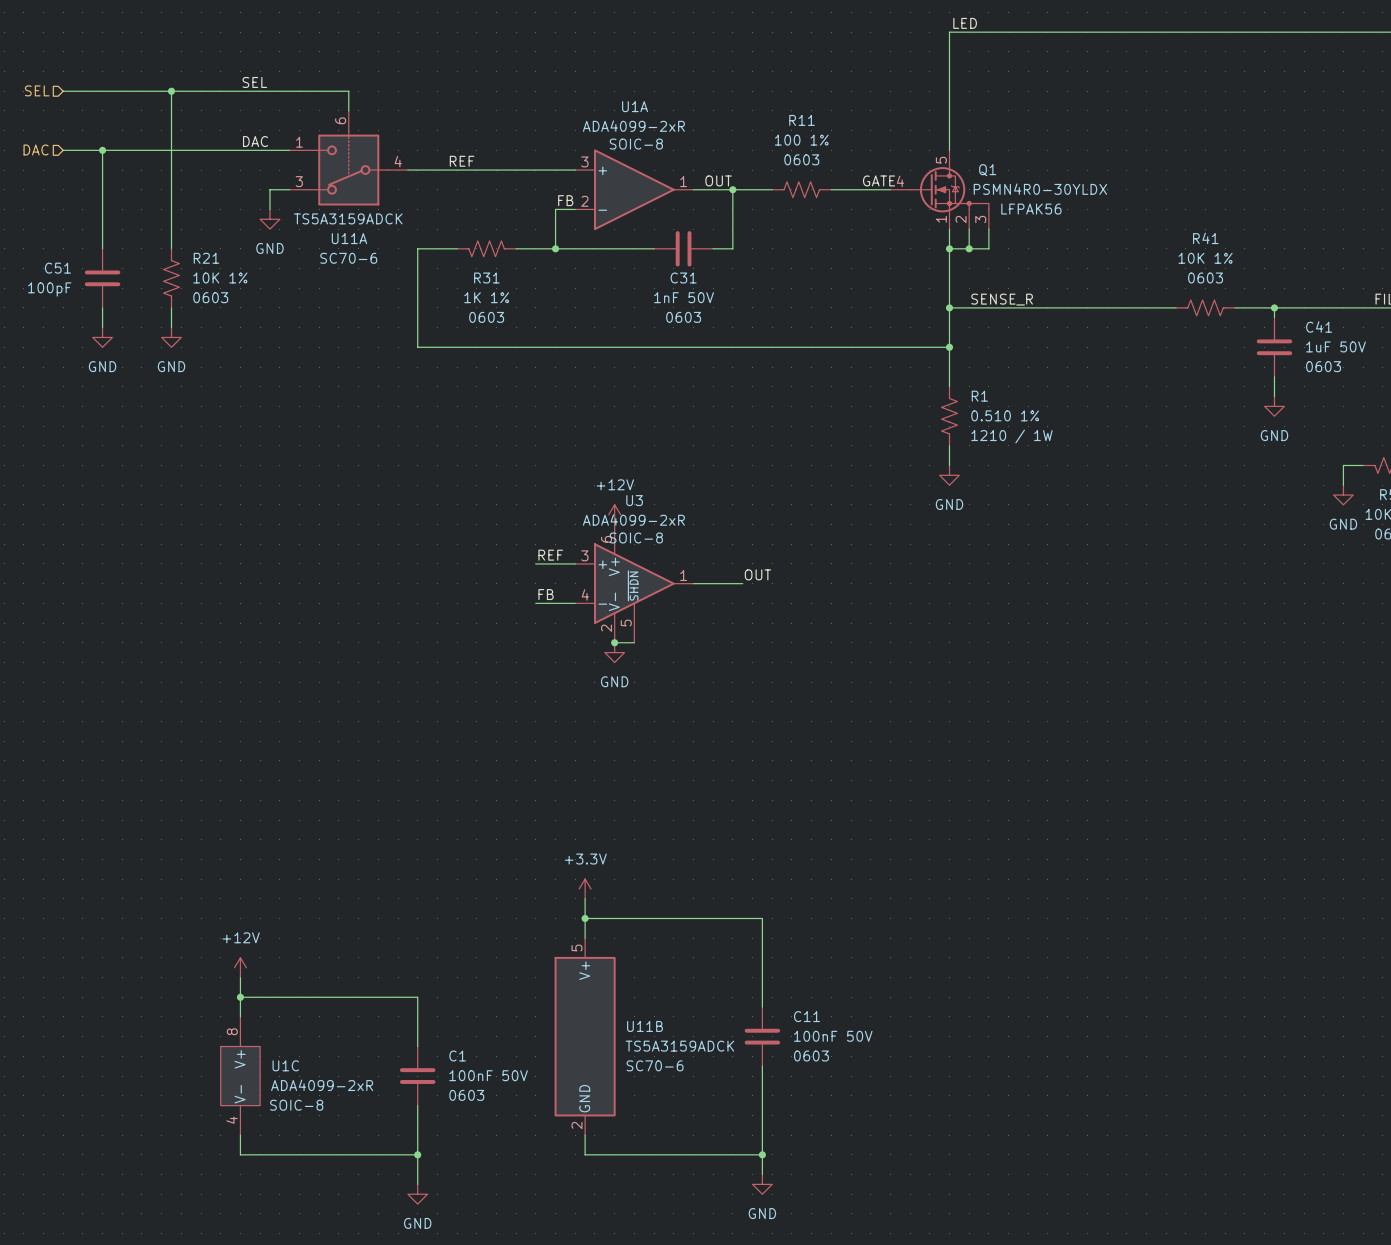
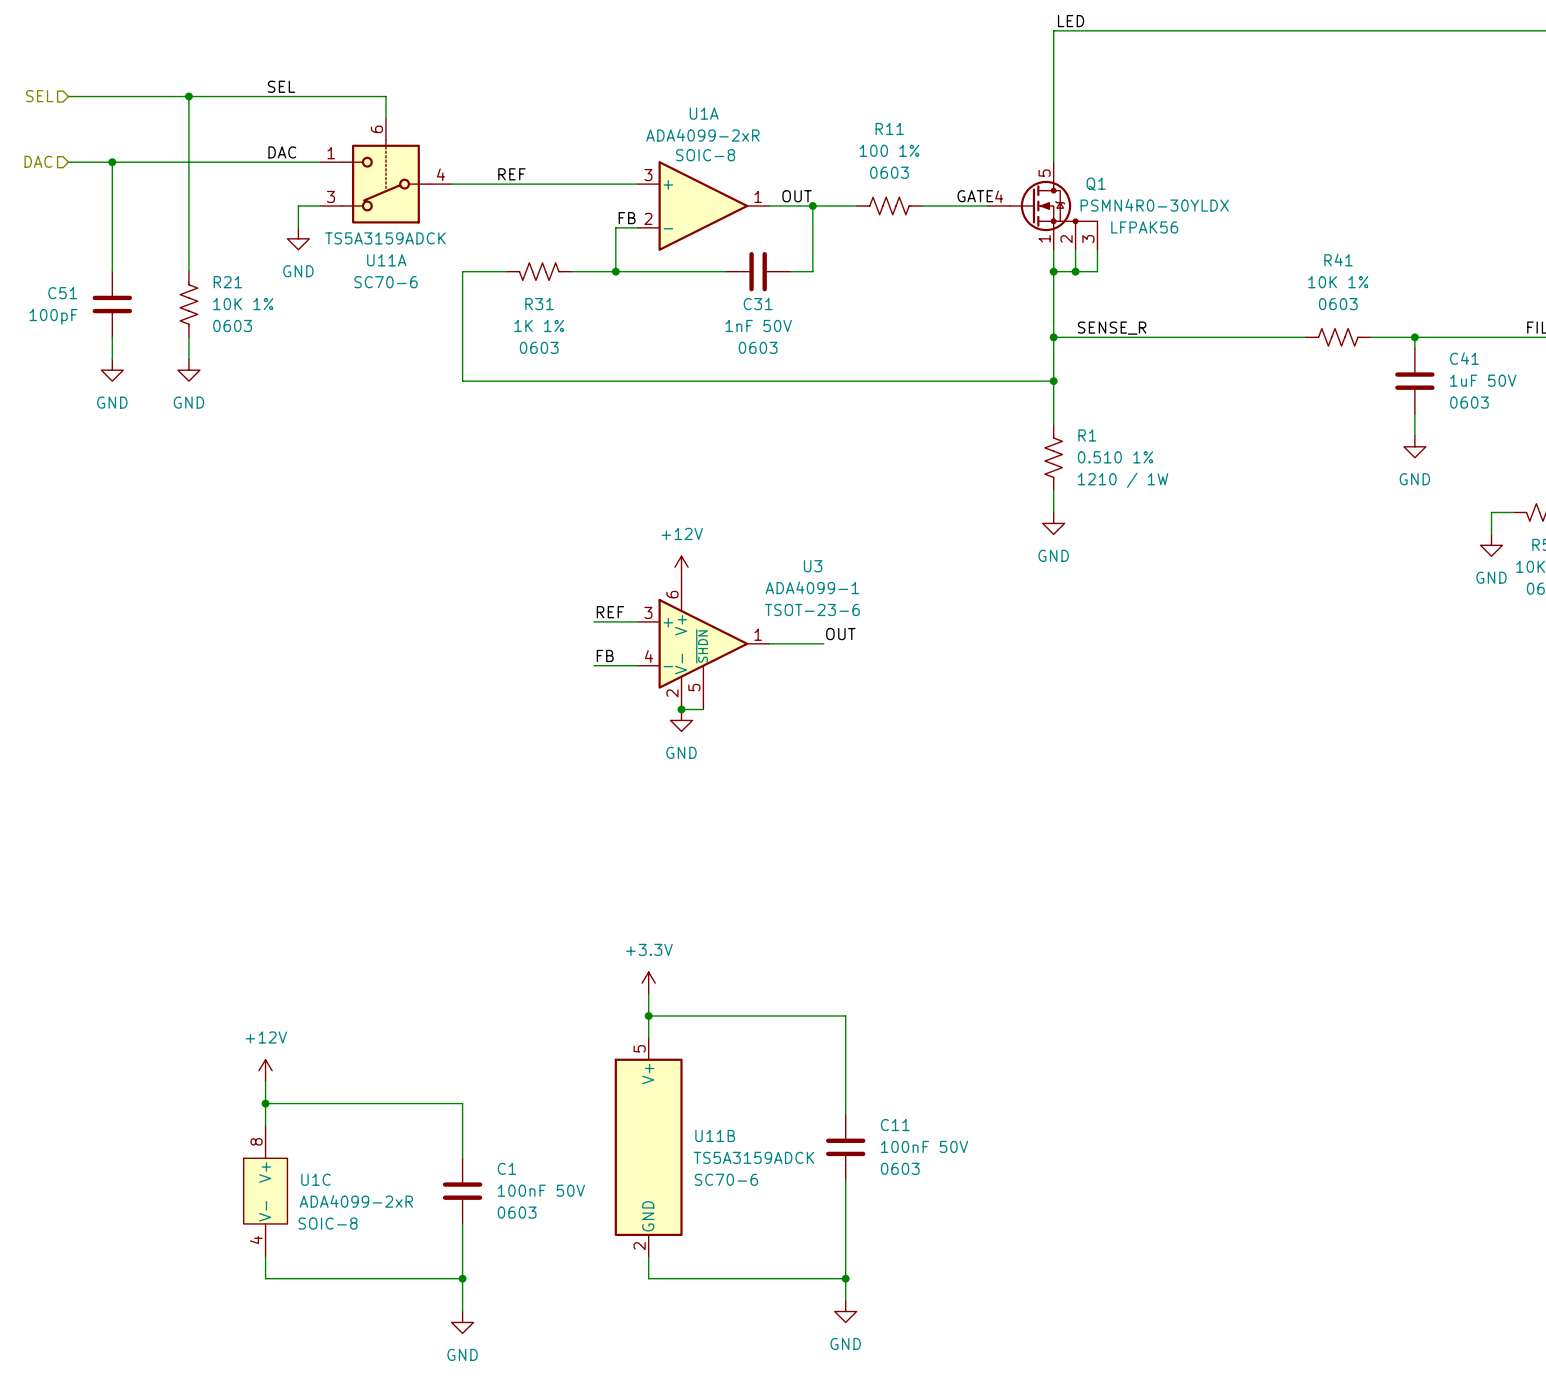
U3 name position: U3 (634, 500) -> U3 (813, 566)
U3 value: ADA4099-2xR (633, 520) -> ADA4099-1 (812, 587)
U3 text: SOIC-8 (636, 537) -> TSOT-23-6 (812, 609)

